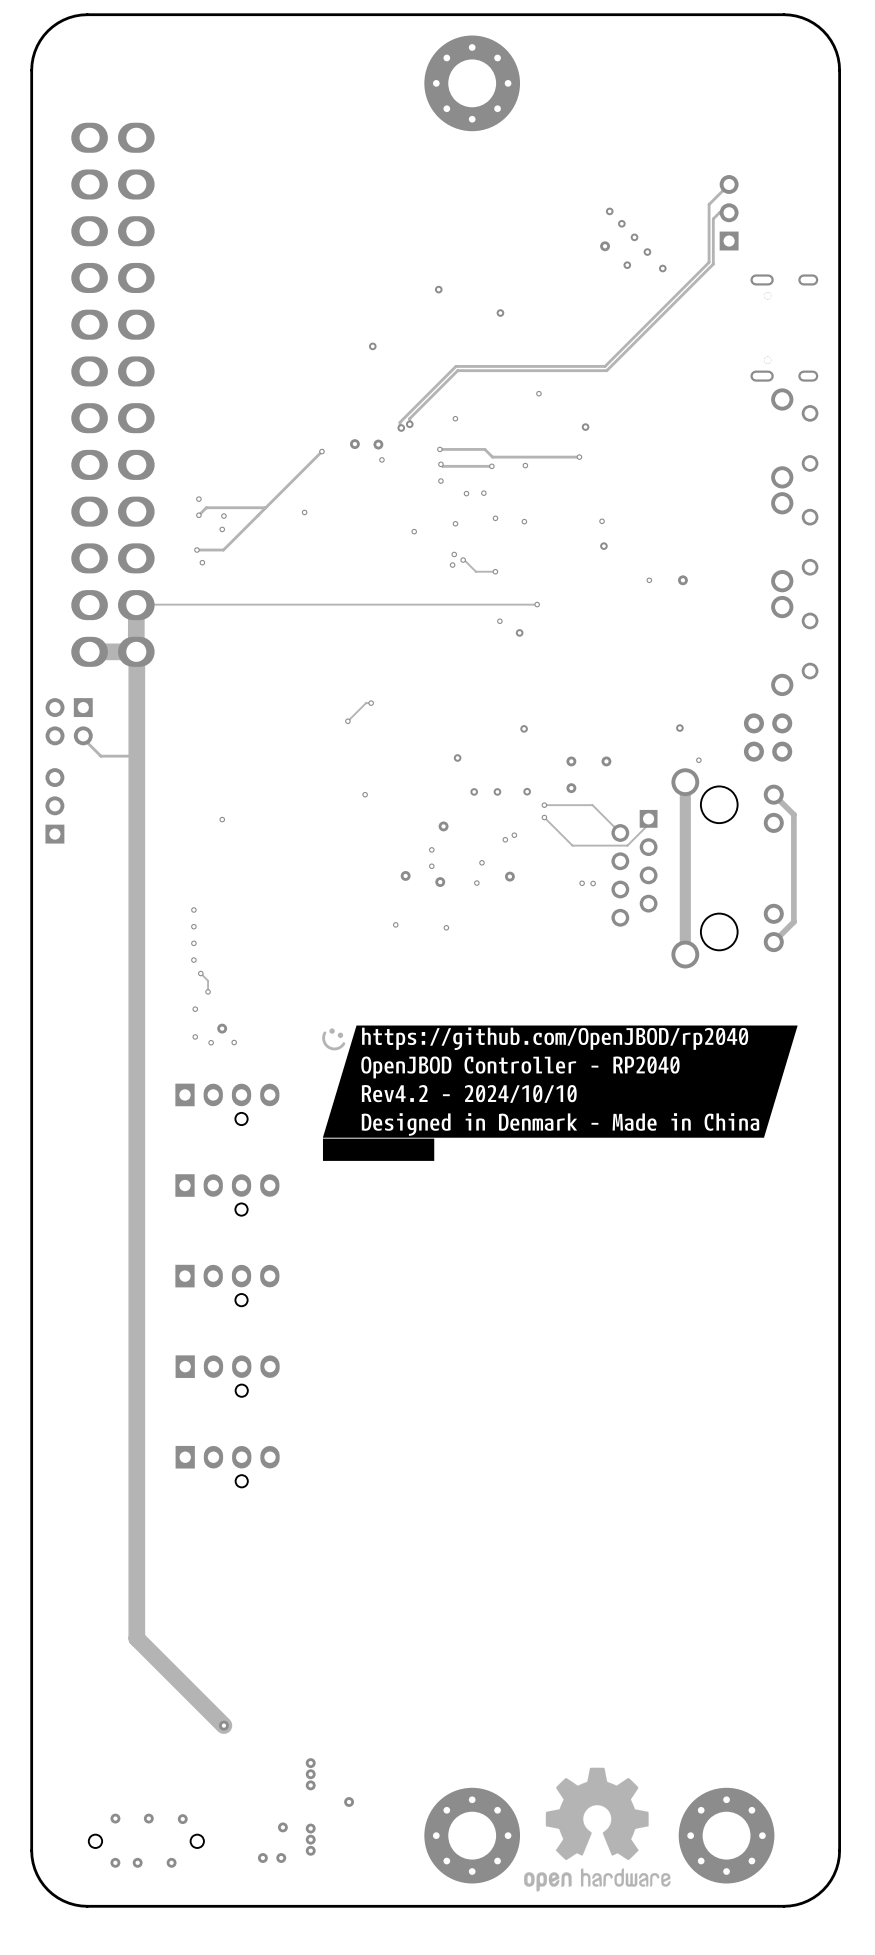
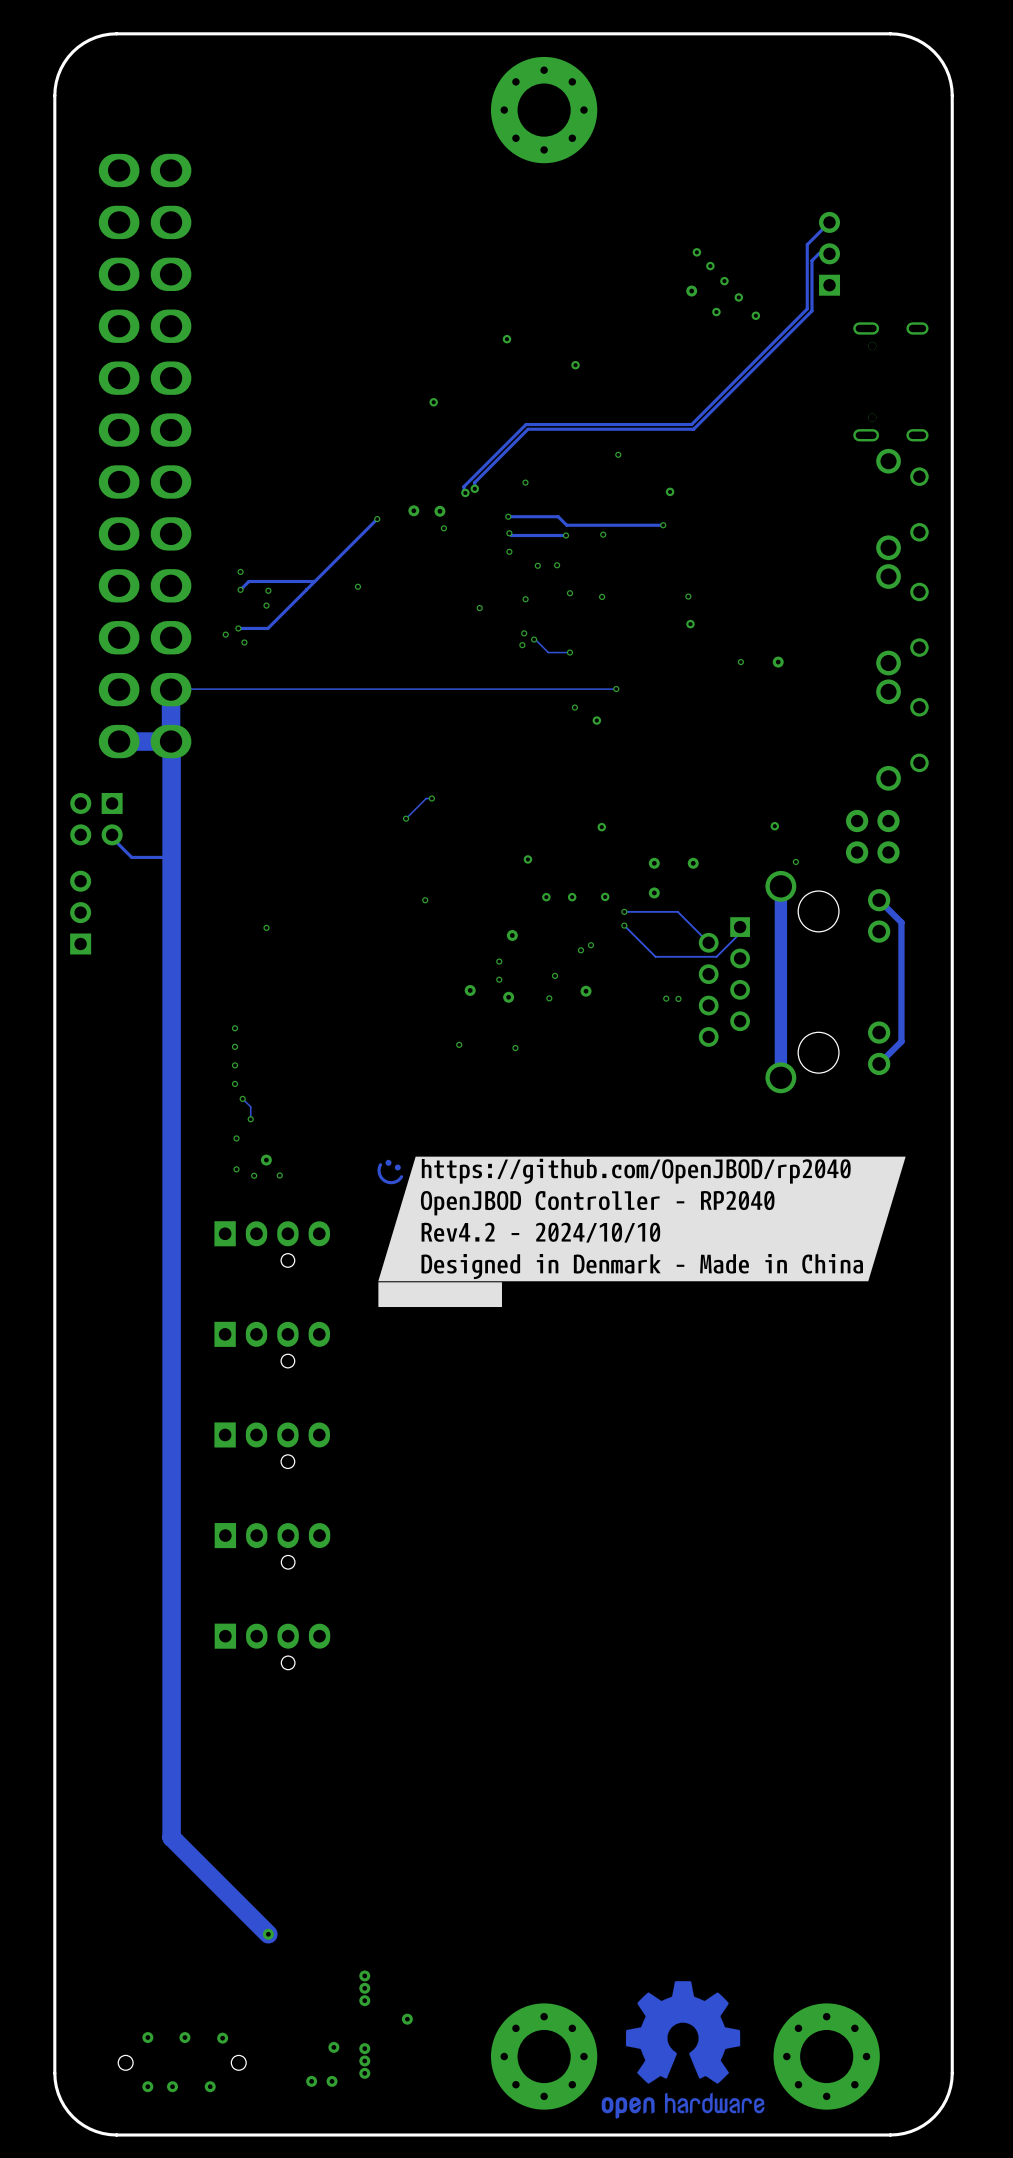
via: none -> (225, 634)

